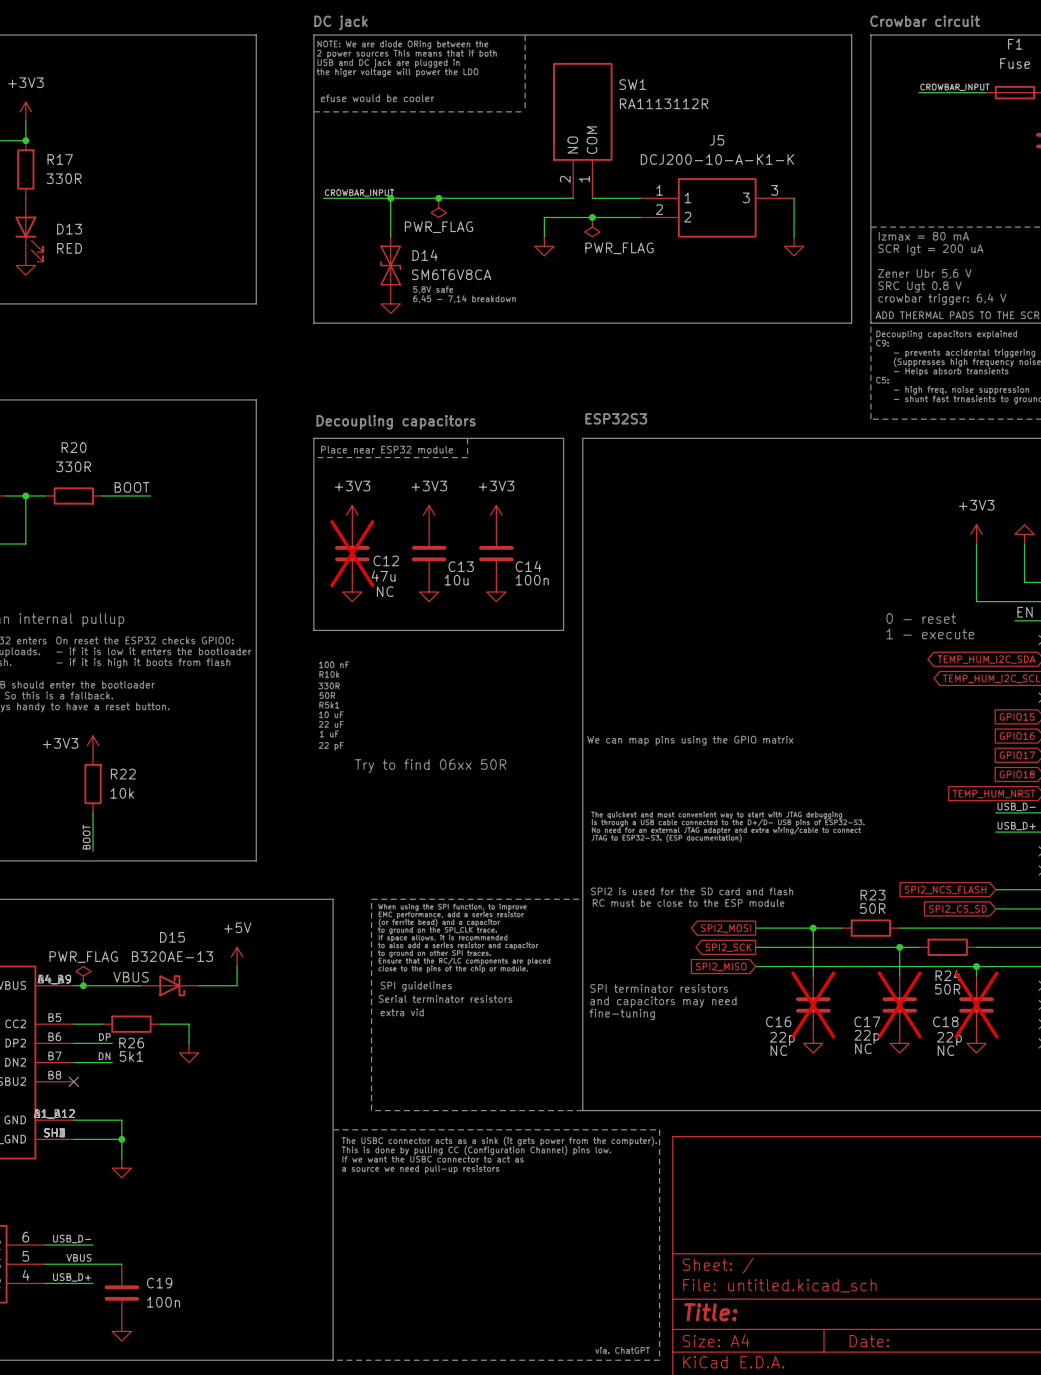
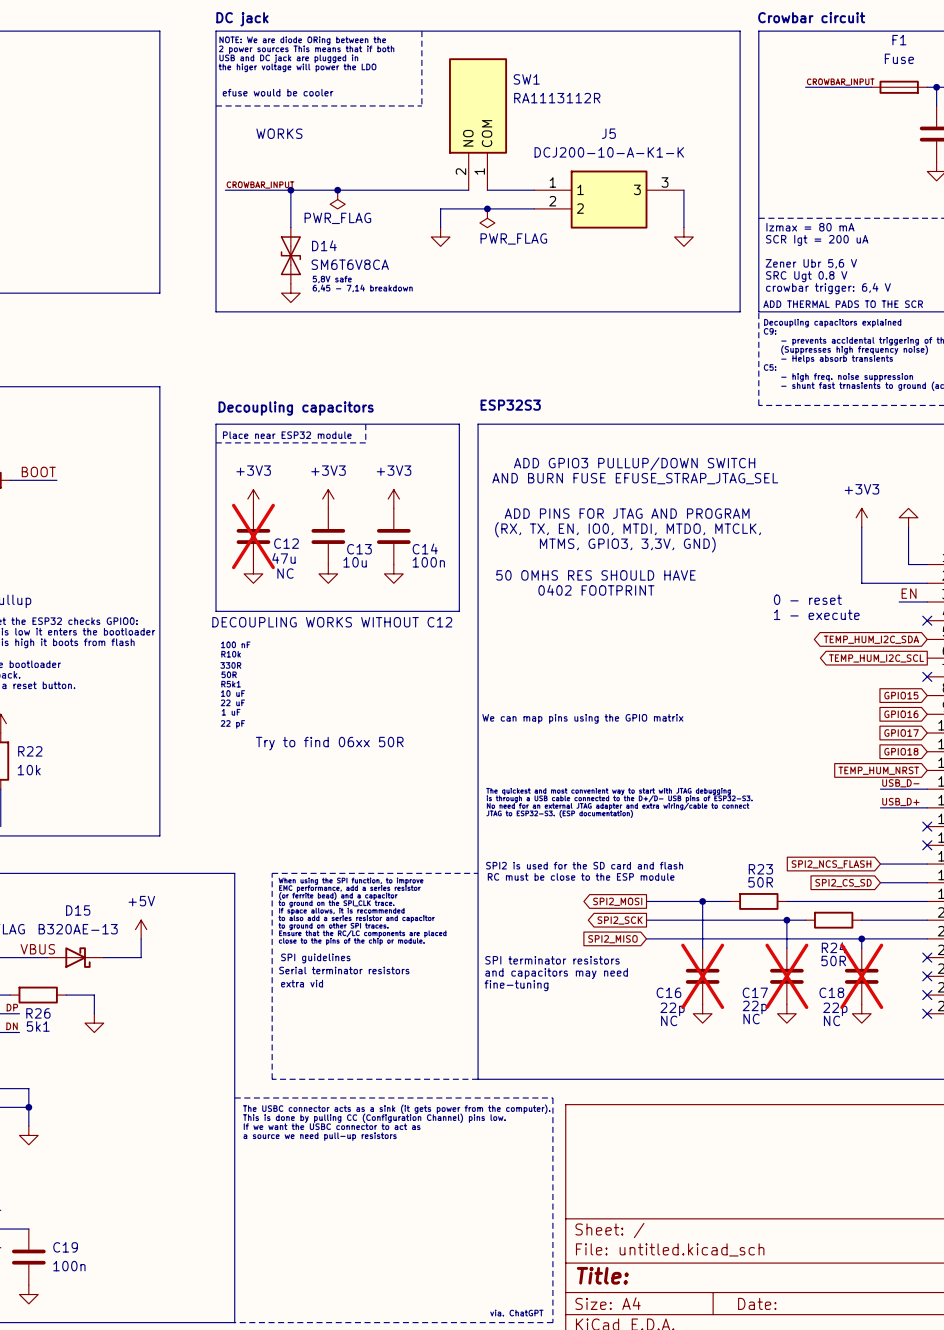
text: none -> WORKS (279, 133)
text: none -> ADD GPIO3 PULLUP/DOWN SWITCH (634, 464)
text: none -> AND BURN FUSE EFUSE_STRAP_JTAG_SEL (635, 478)
text: none -> ADD PINS FOR JTAG AND PROGRAM (627, 513)
text: none -> (RX, TX, EN, IO0, MTDI, MTDO, MTCLK, (628, 529)
text: none -> MTMS, GPIO3, 3,3V, GND) (627, 544)
text: none -> 50 OMHS RES SHOULD HAVE (595, 575)
text: none -> 0402 FOOTPRINT (596, 590)
text: none -> DECOUPLING WORKS WITHOUT C12 (332, 622)

